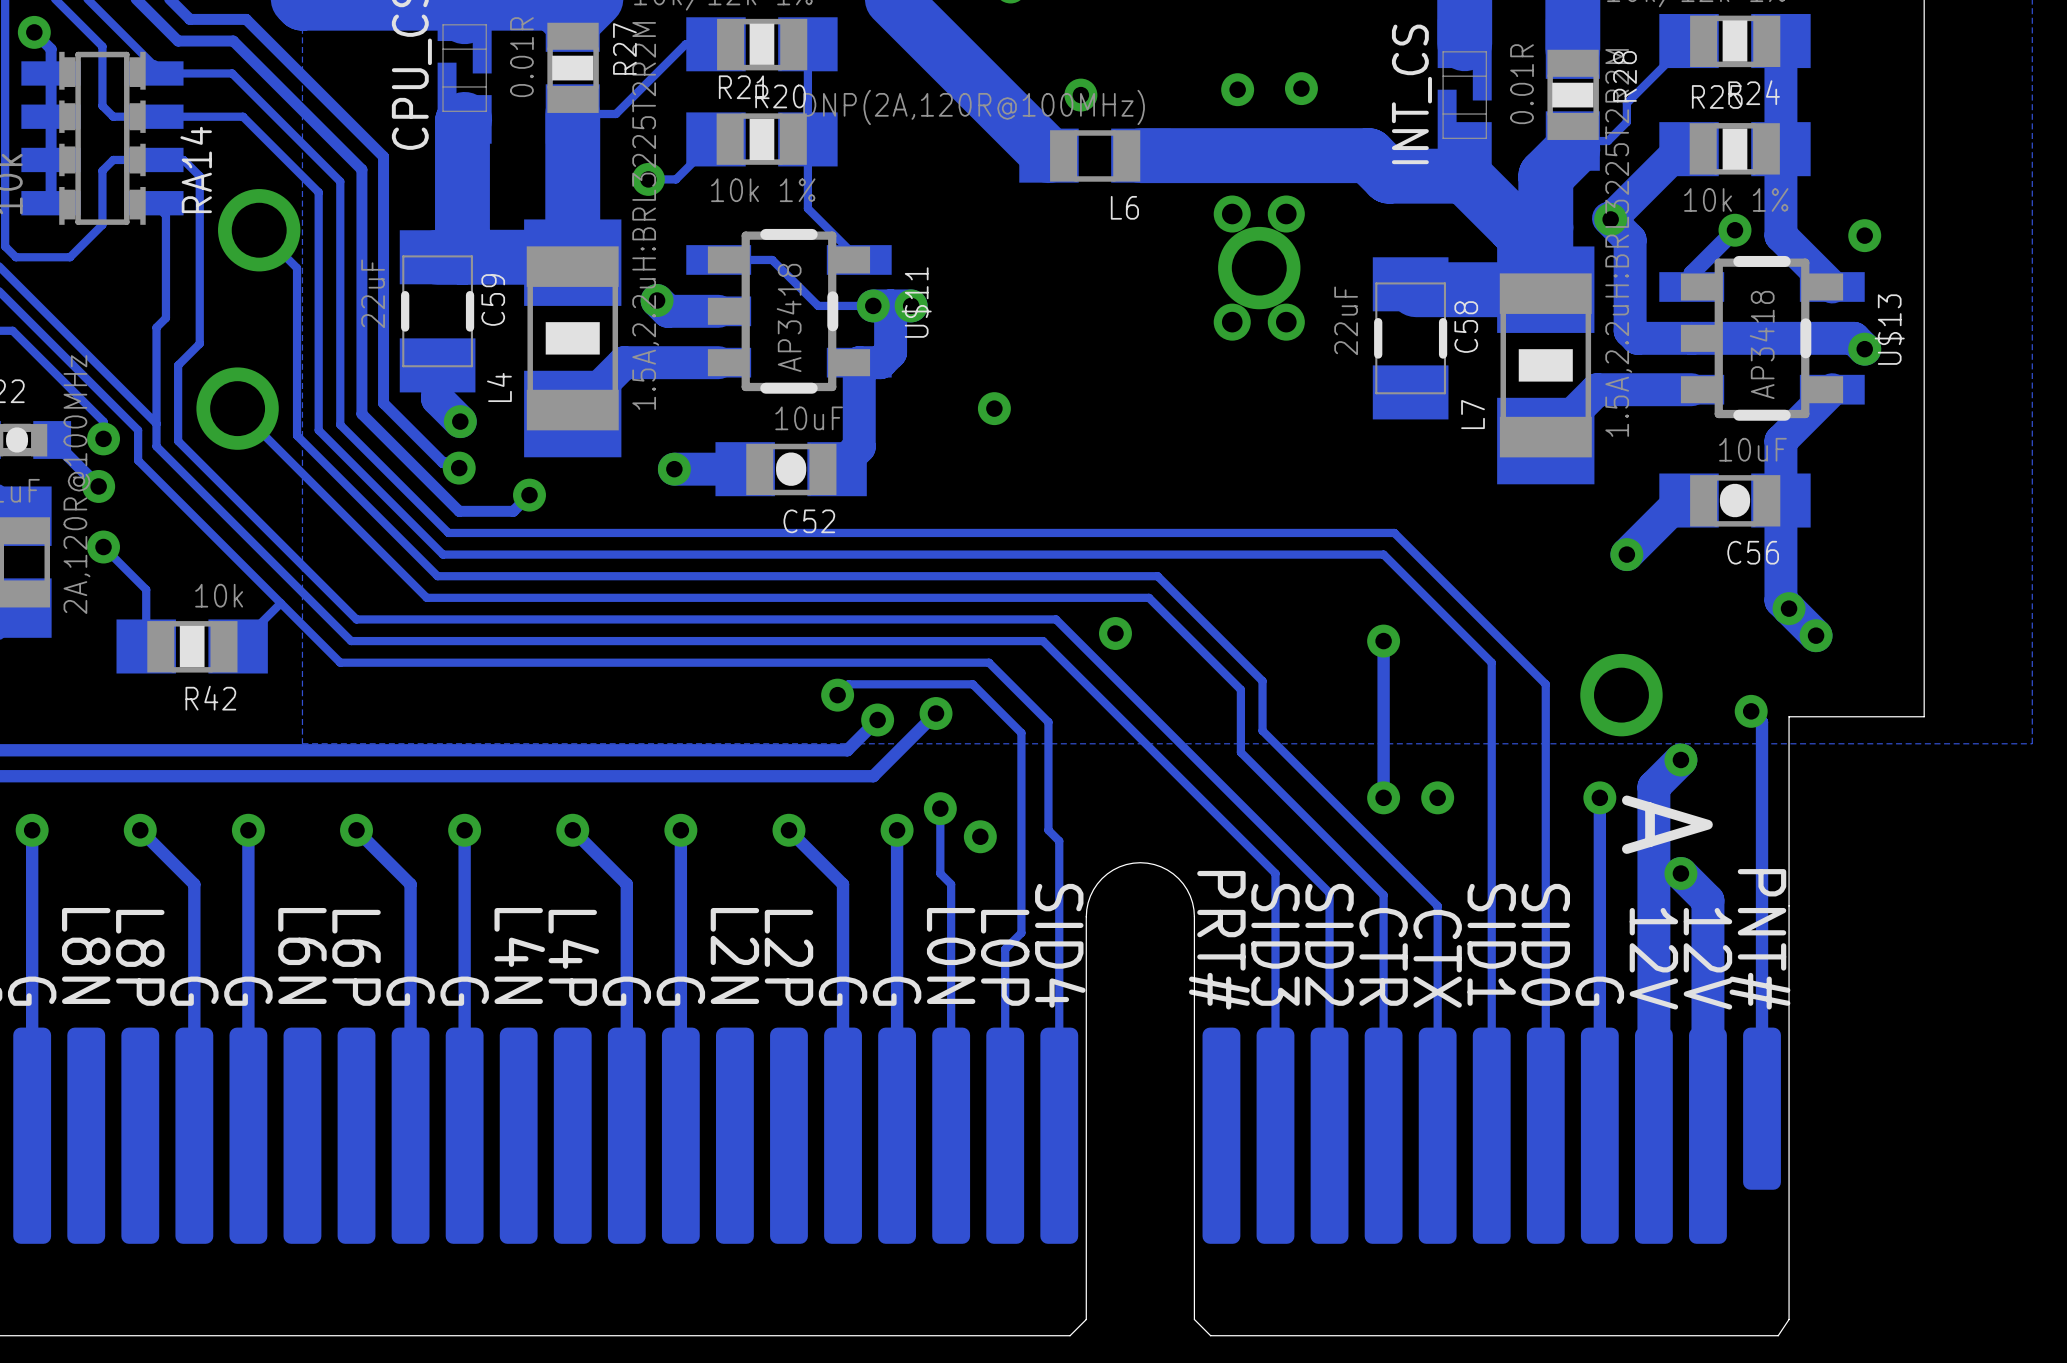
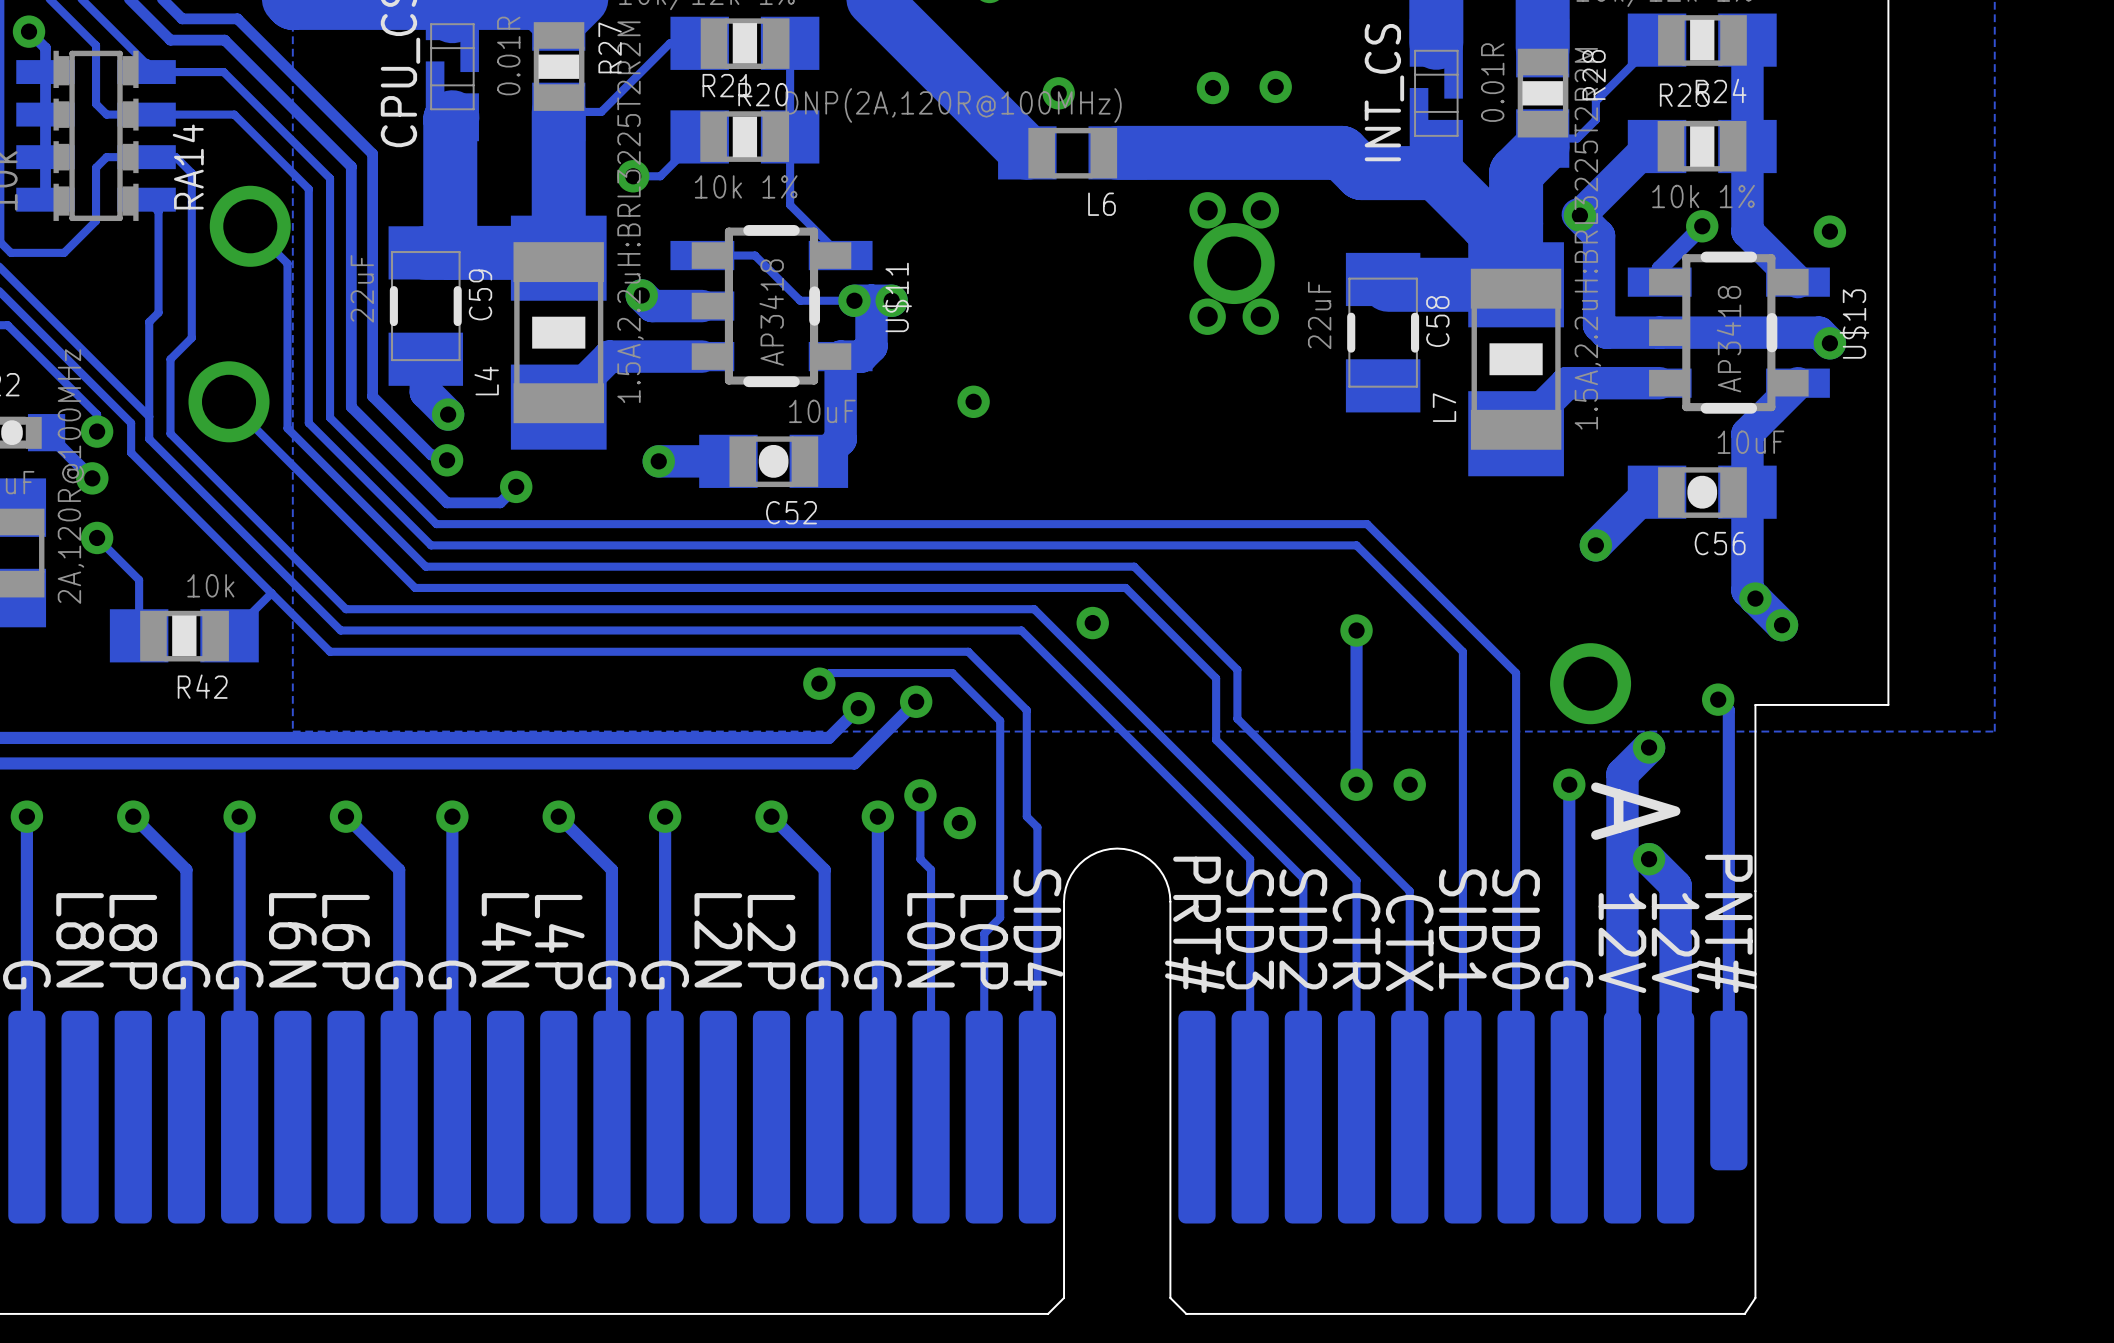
C52 value position: 10uF (809, 418) -> 10uF (822, 411)
C56 value position: 10uF (1752, 449) -> 10uF (1751, 442)

